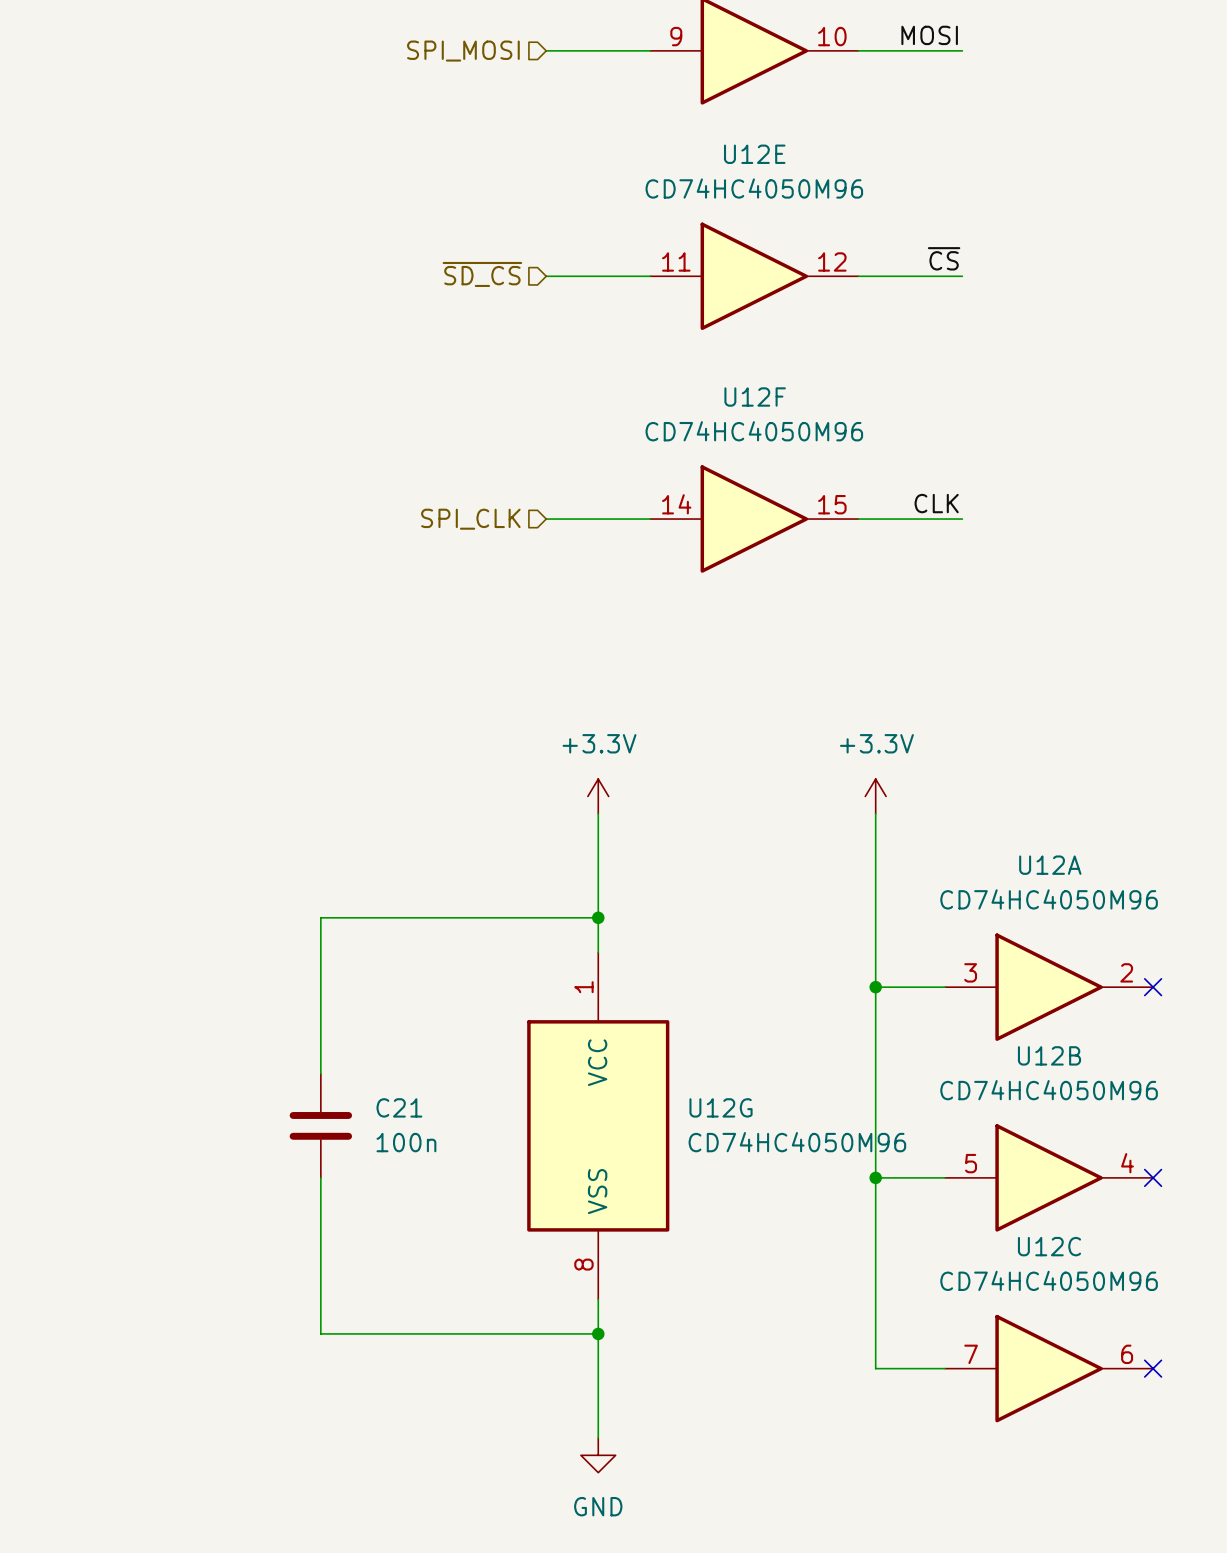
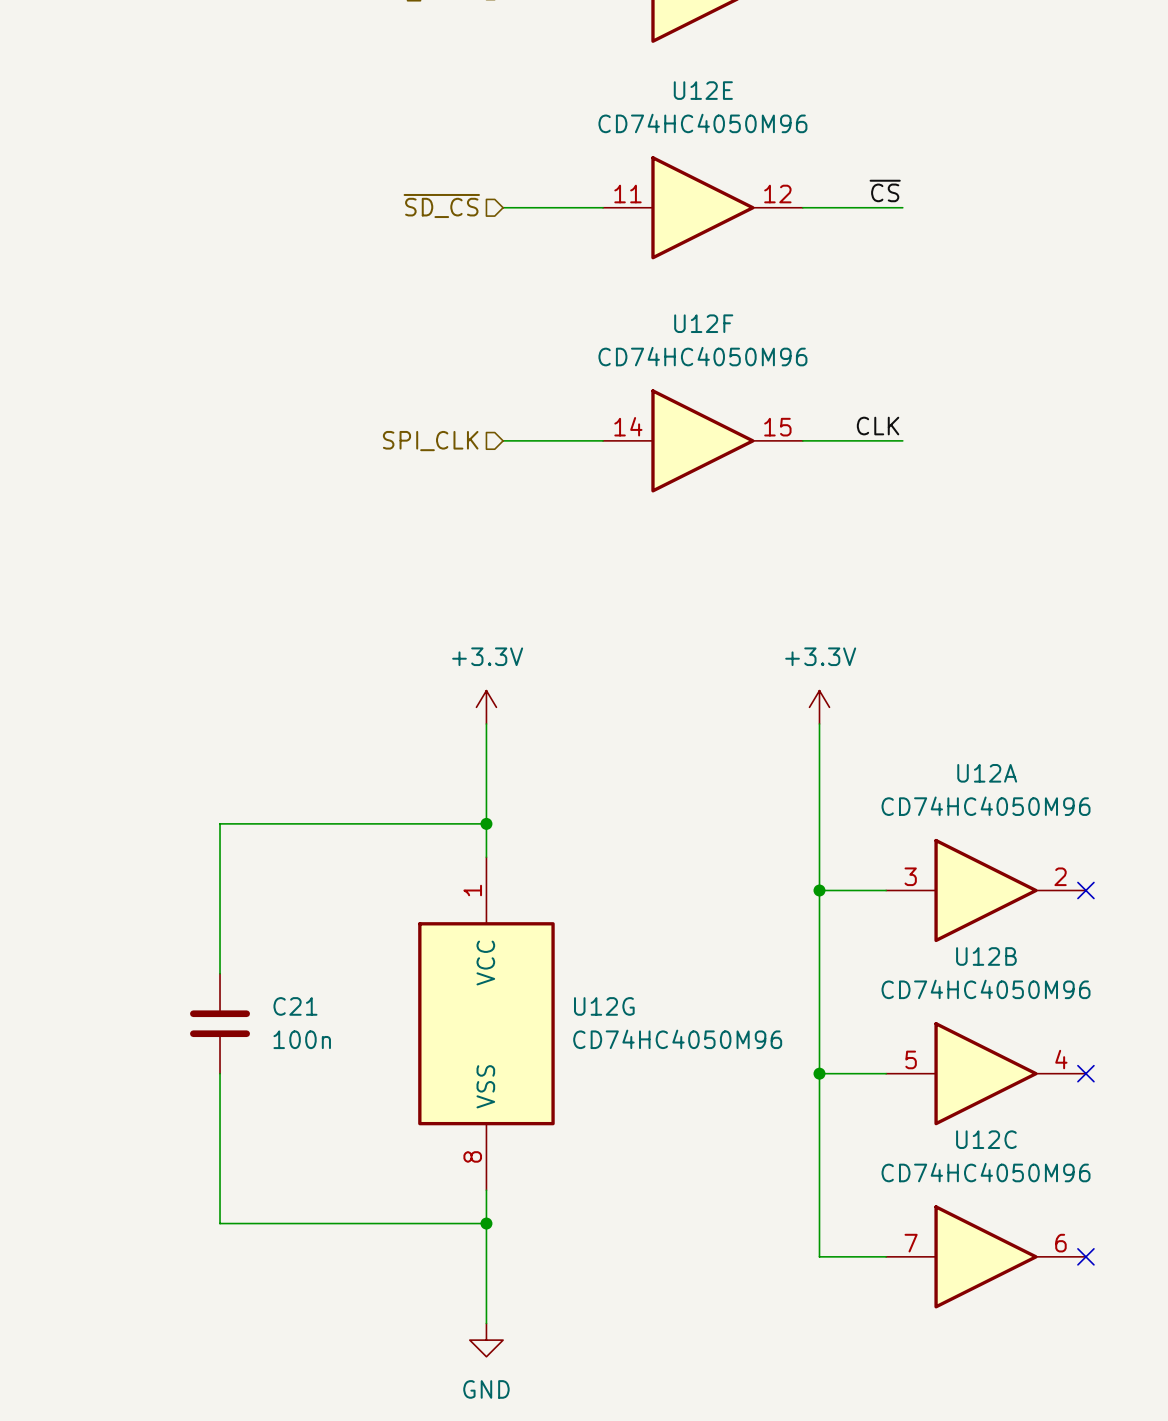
power symbol position: +3.3V (598, 796) -> +3.3V (486, 707)
wire: (598, 813) (598, 952) -> (486, 723) (486, 857)
wire: (320, 917) (320, 1073) -> (286, 823) (220, 823) (220, 973)
wire: (528, 917) (598, 917) -> none
junction position: (598, 917) -> (486, 823)
C21 position: (320, 1125) -> (220, 1023)
U12G position: (598, 1125) -> (486, 1023)
wire: (320, 1177) (320, 1333) -> (220, 1073) (220, 1223) (286, 1223)
wire: (598, 1299) (598, 1437) -> (486, 1190) (486, 1323)
wire: (528, 1333) (598, 1333) -> none
junction position: (598, 1333) -> (486, 1223)
power symbol position: GND (598, 1455) -> GND (486, 1340)

